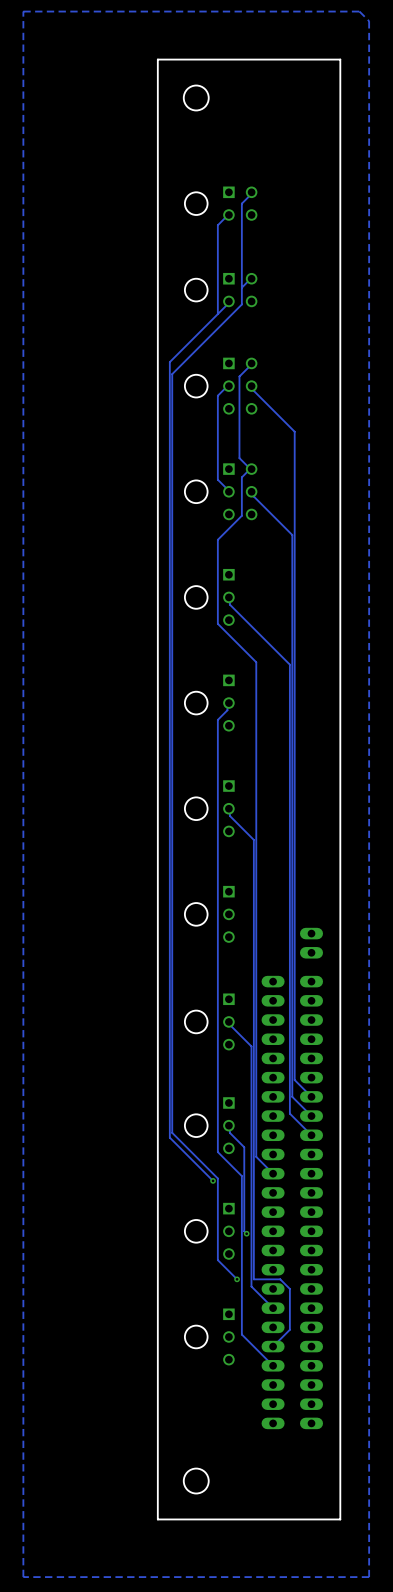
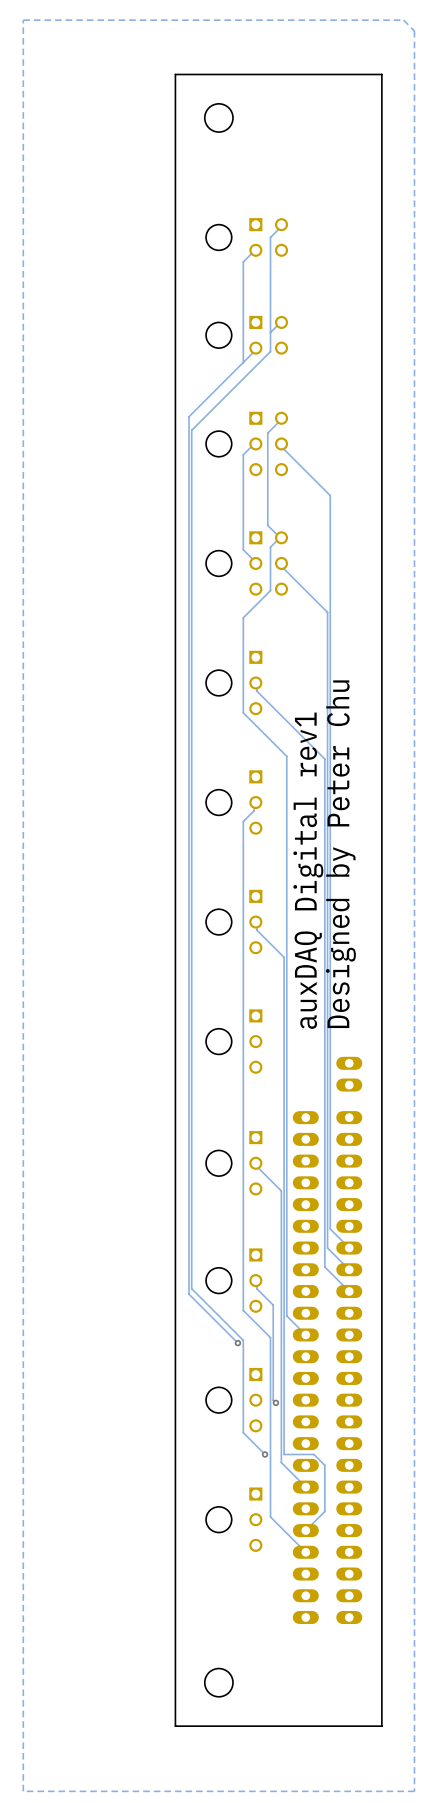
text: none -> Designed by Peter Chu (340, 854)
text: none -> auxDAQ Digital rev1 (308, 870)

